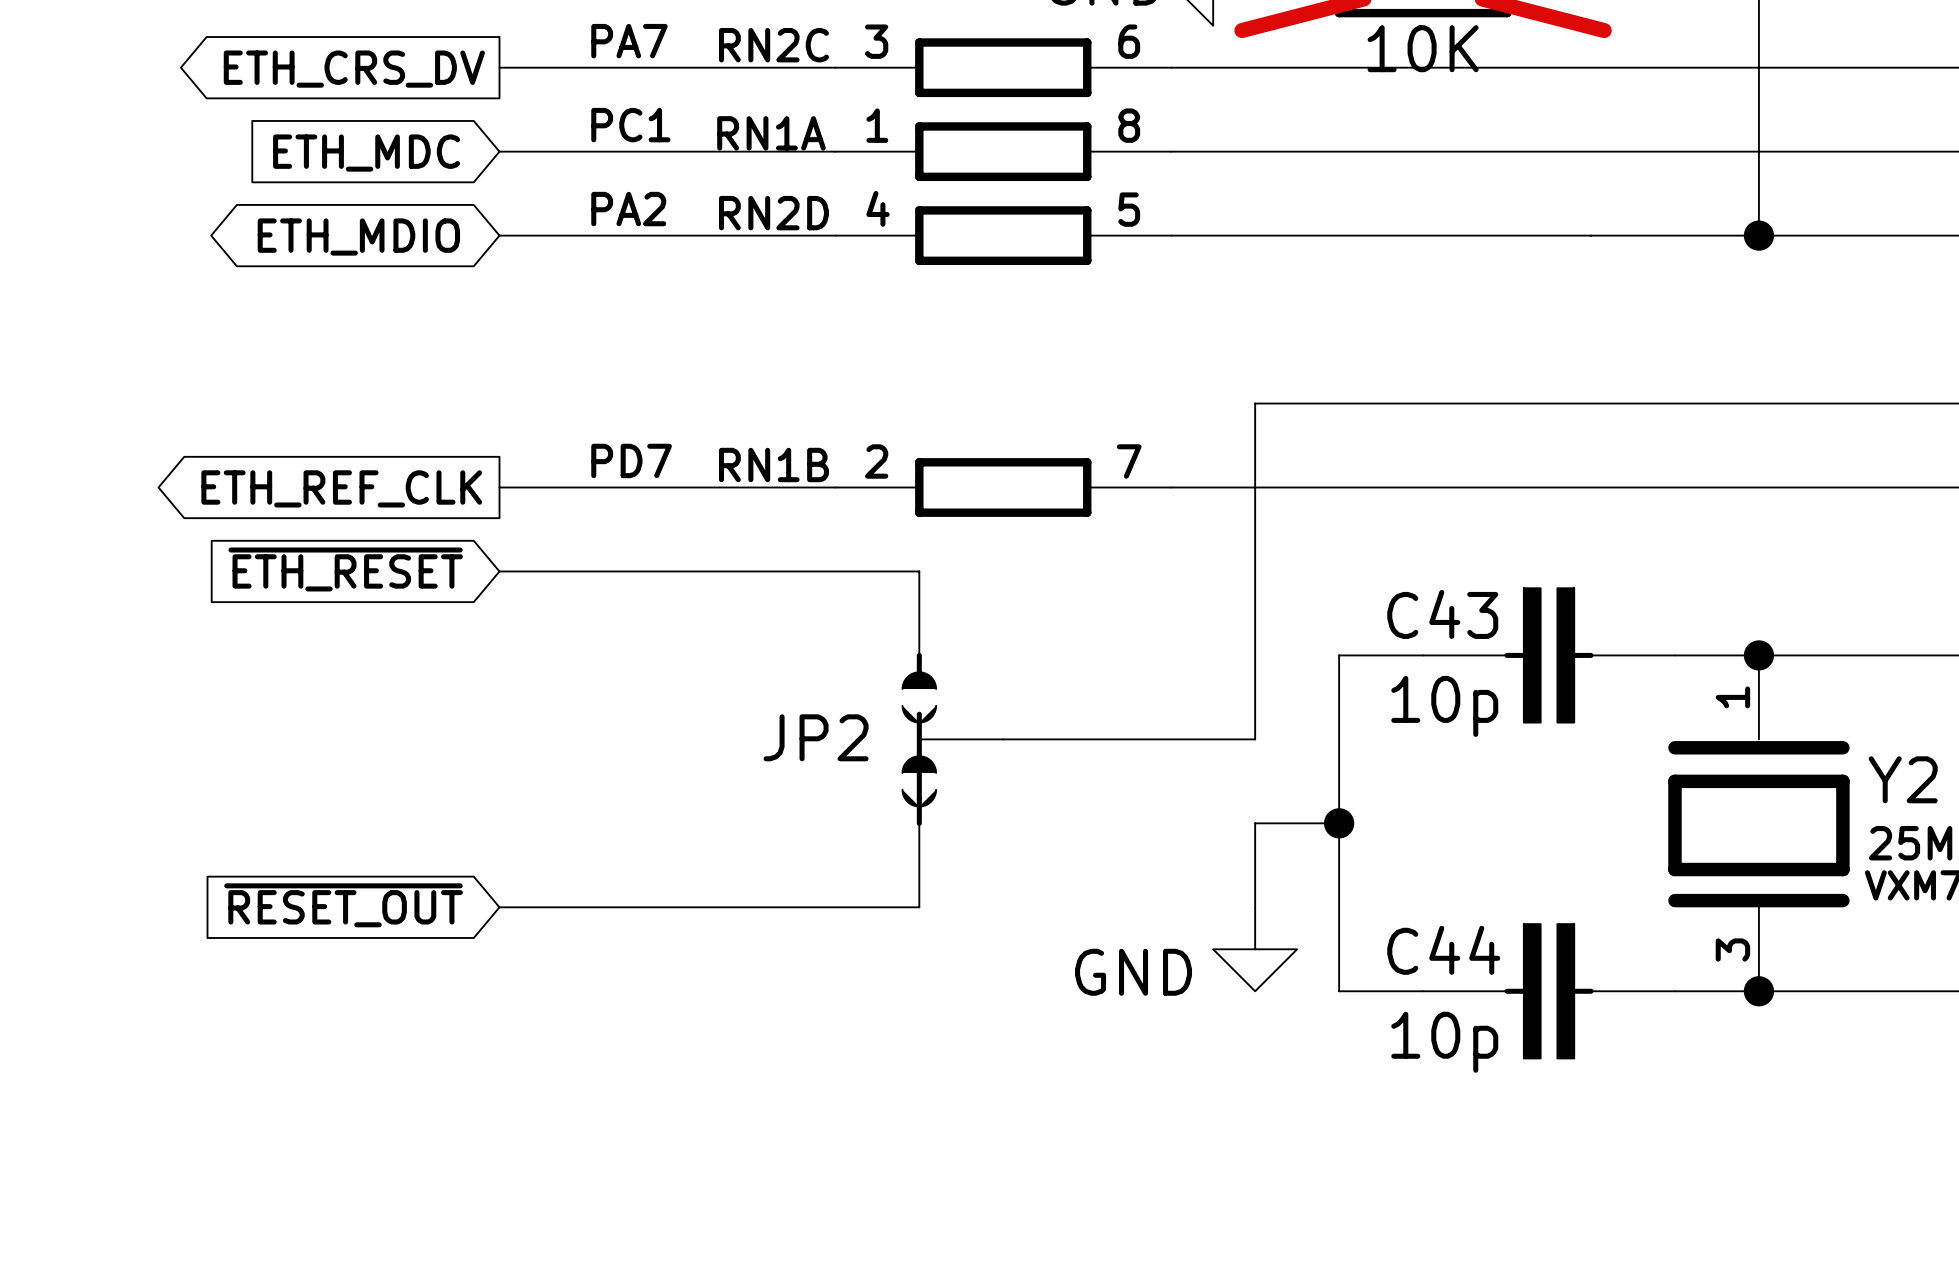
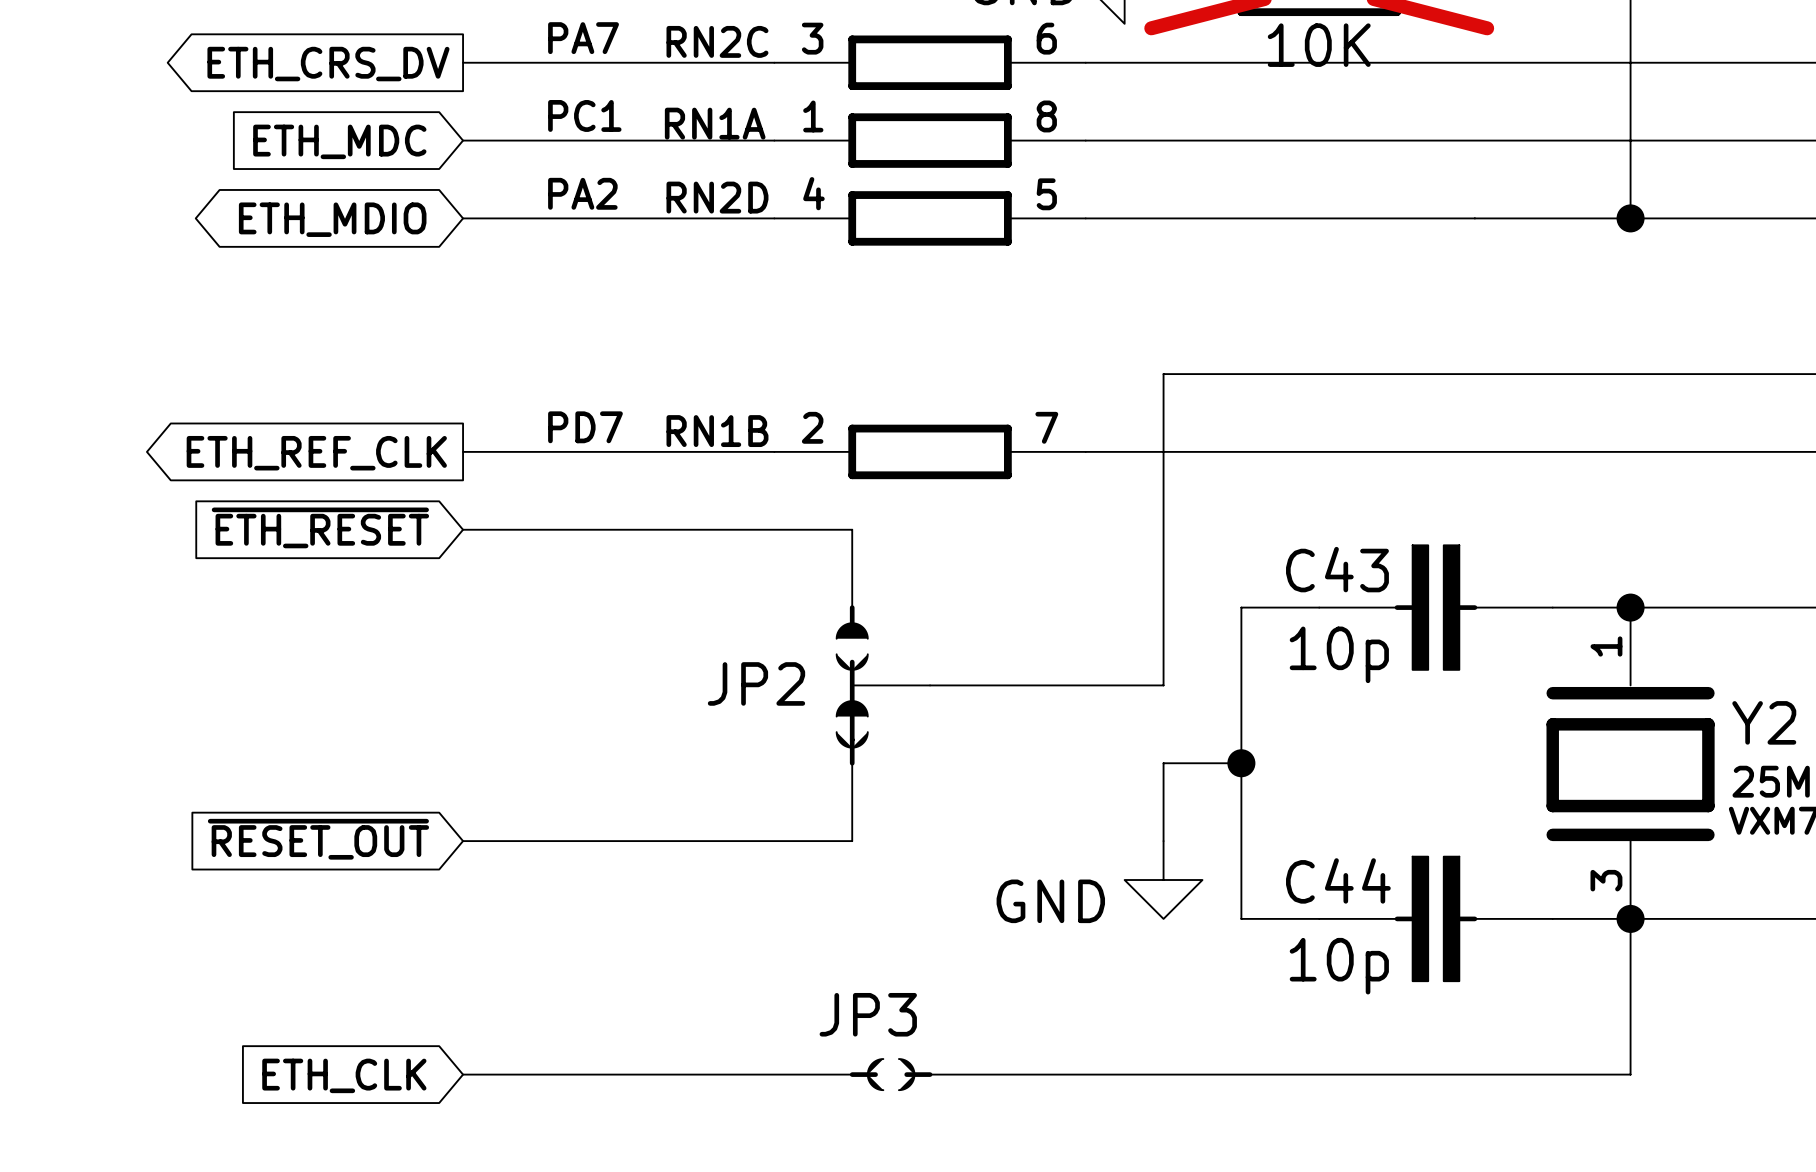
wire: none -> (1630, 918) (1630, 1074) (930, 1074)
wire: none -> (463, 1074) (852, 1074)
JP3: none -> (891, 1074)
global label: none -> ETH_CLK (344, 1075)

